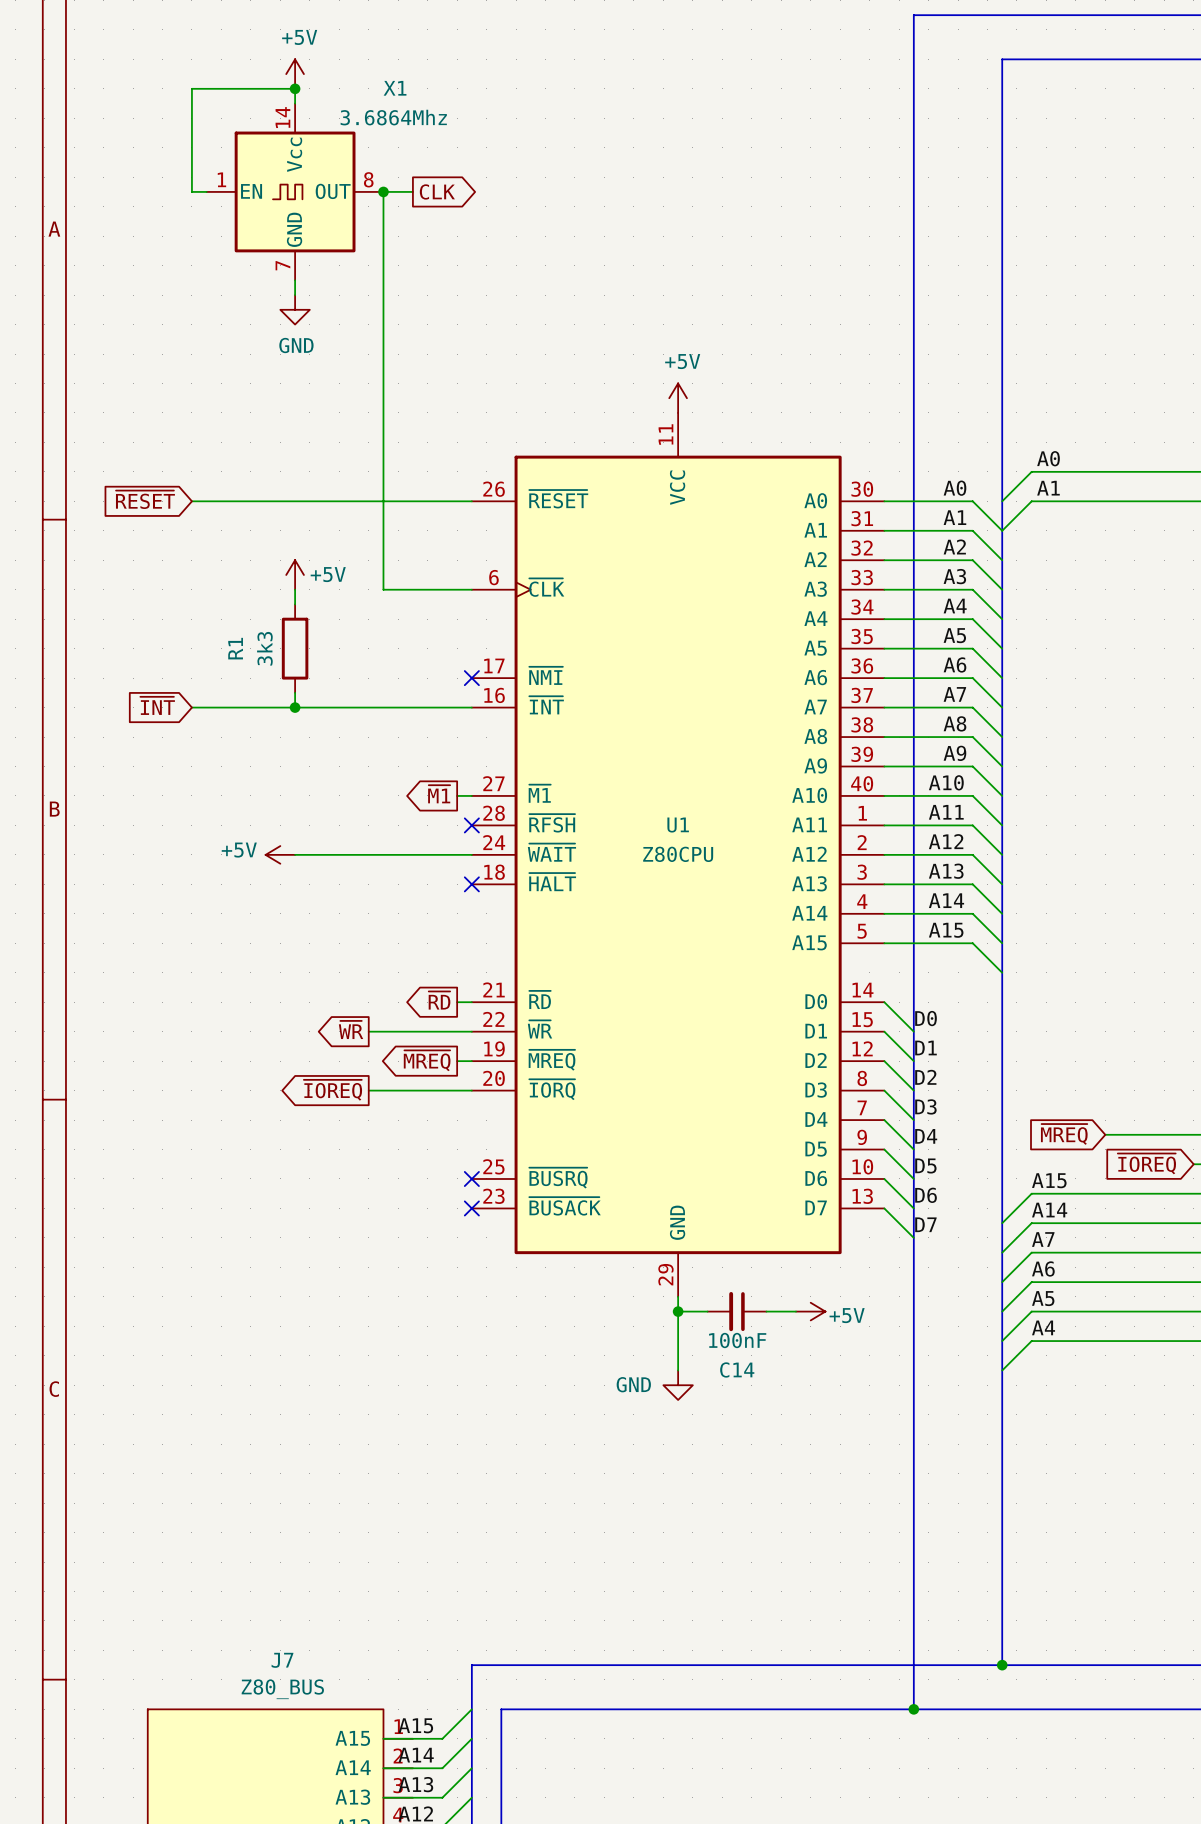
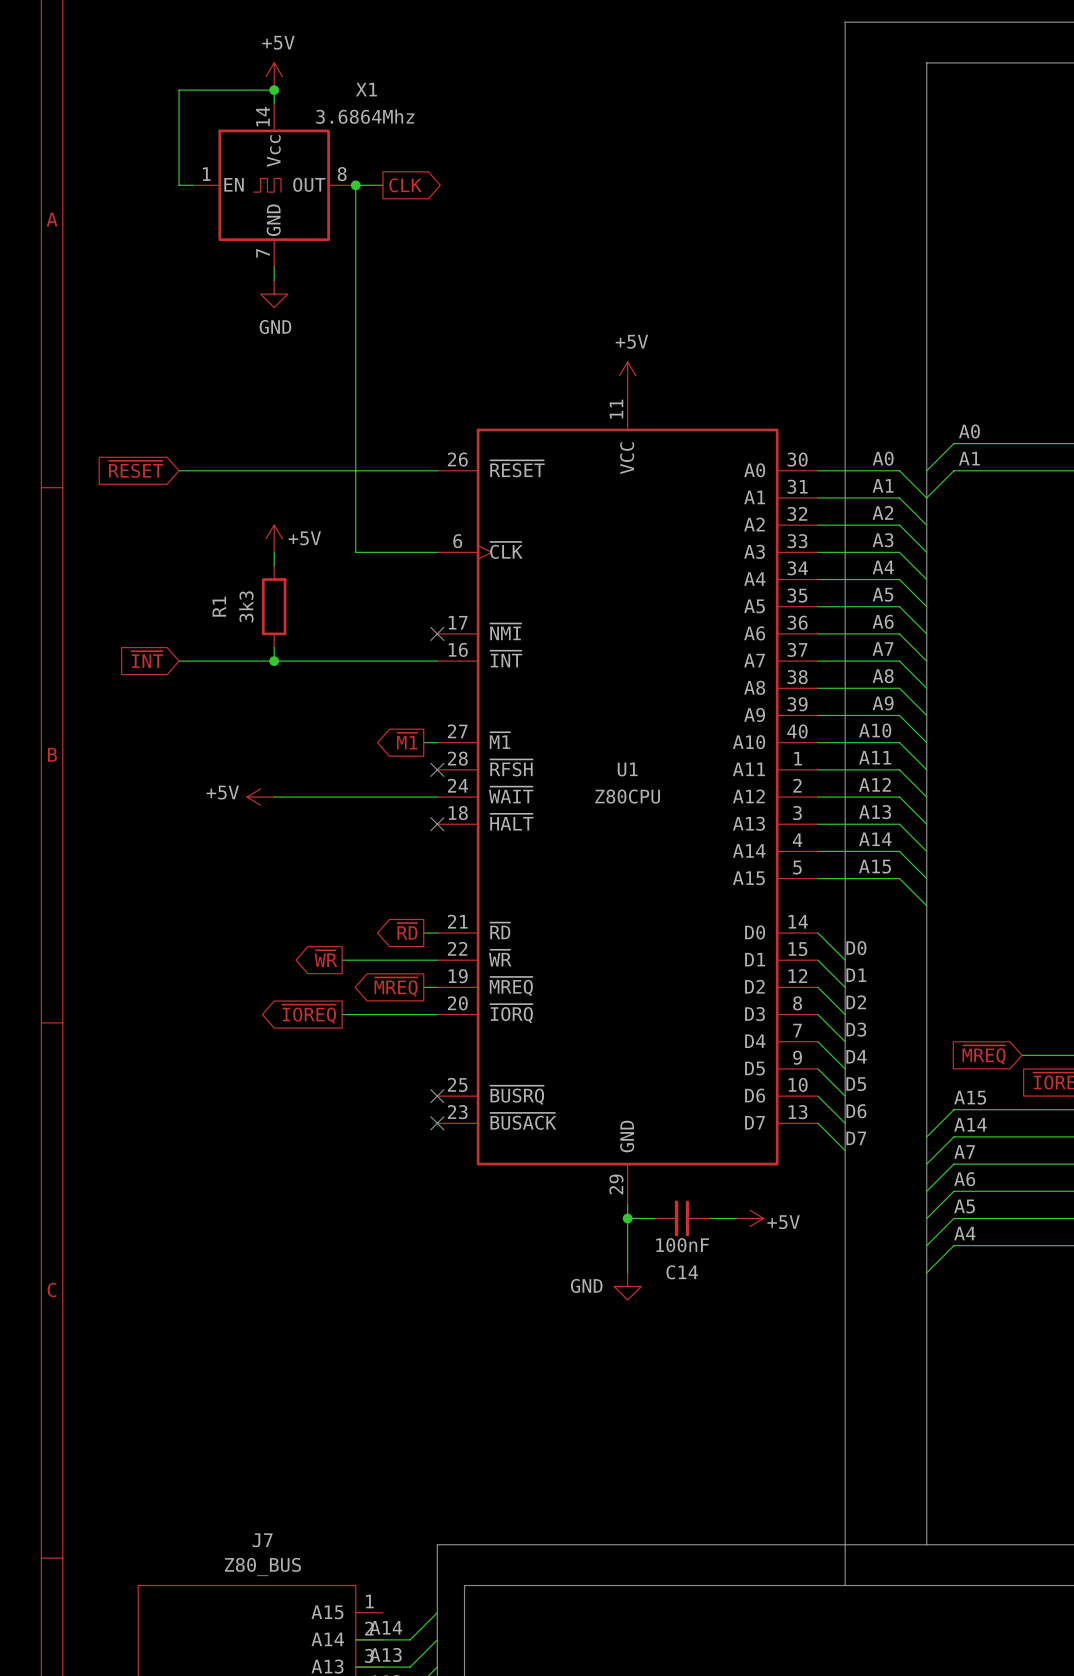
junction: (1002, 1665) -> none
wire: (471, 1709) (442, 1738) (383, 1738) -> none
junction: (913, 1709) -> none
label: A15 (415, 1725) -> none

